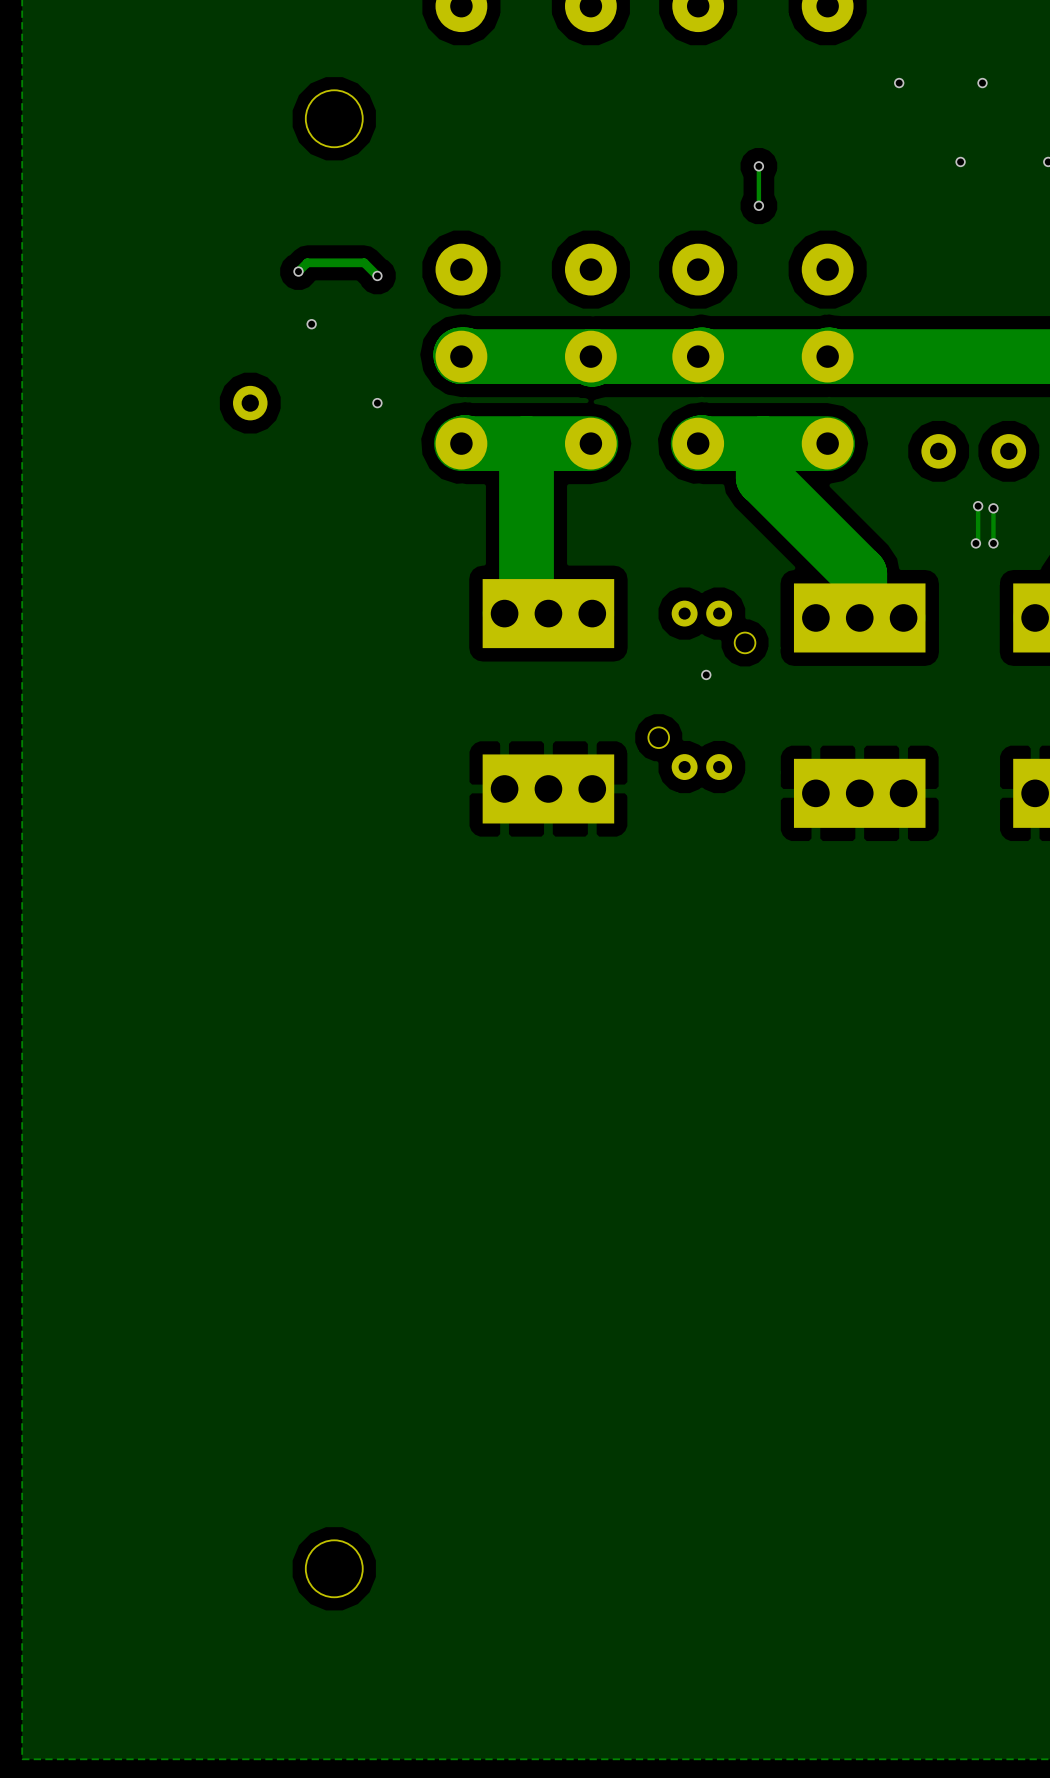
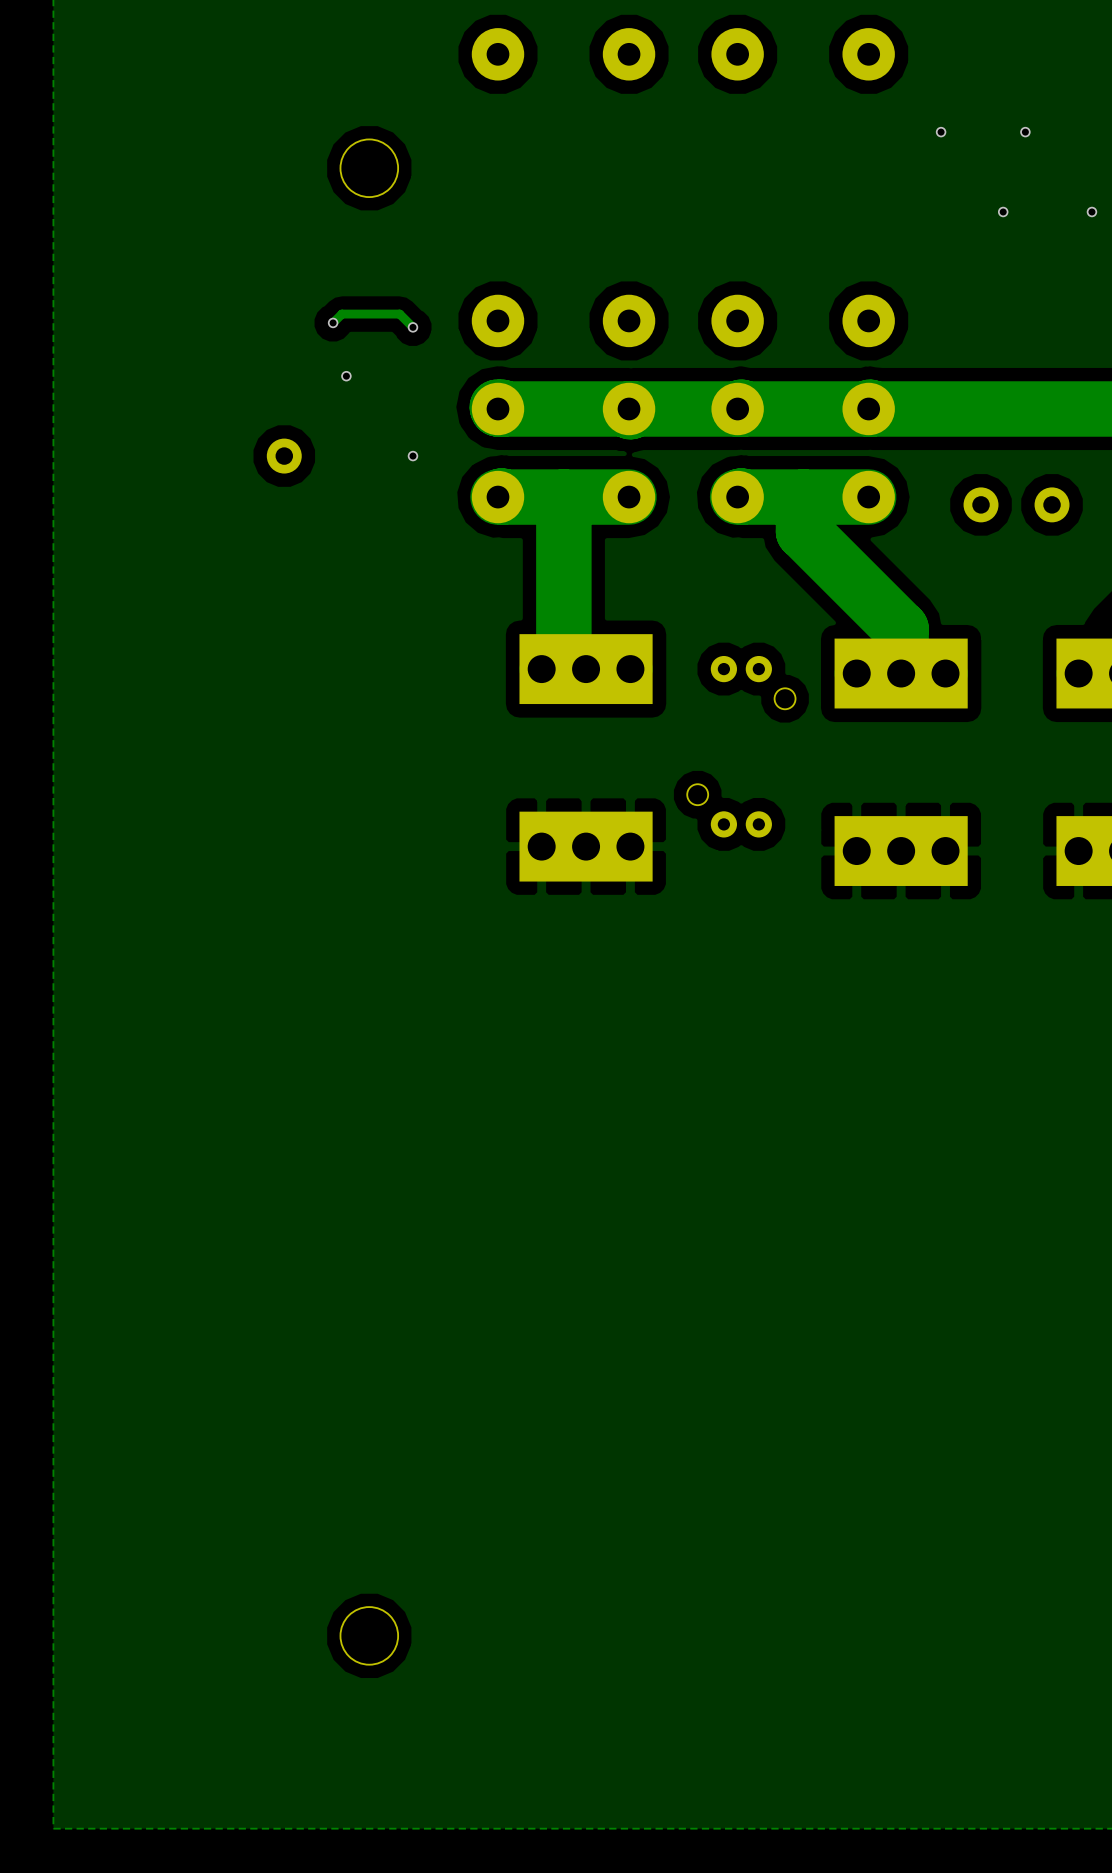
track: (758, 166) (758, 205) -> none
via: (758, 166) -> none
via: (758, 205) -> none
track: (978, 506) (978, 541) (975, 543) -> none
via: (978, 506) -> none
track: (993, 508) (993, 543) -> none
via: (993, 508) -> none
via: (975, 543) -> none
via: (993, 543) -> none
via: (706, 674) -> none

